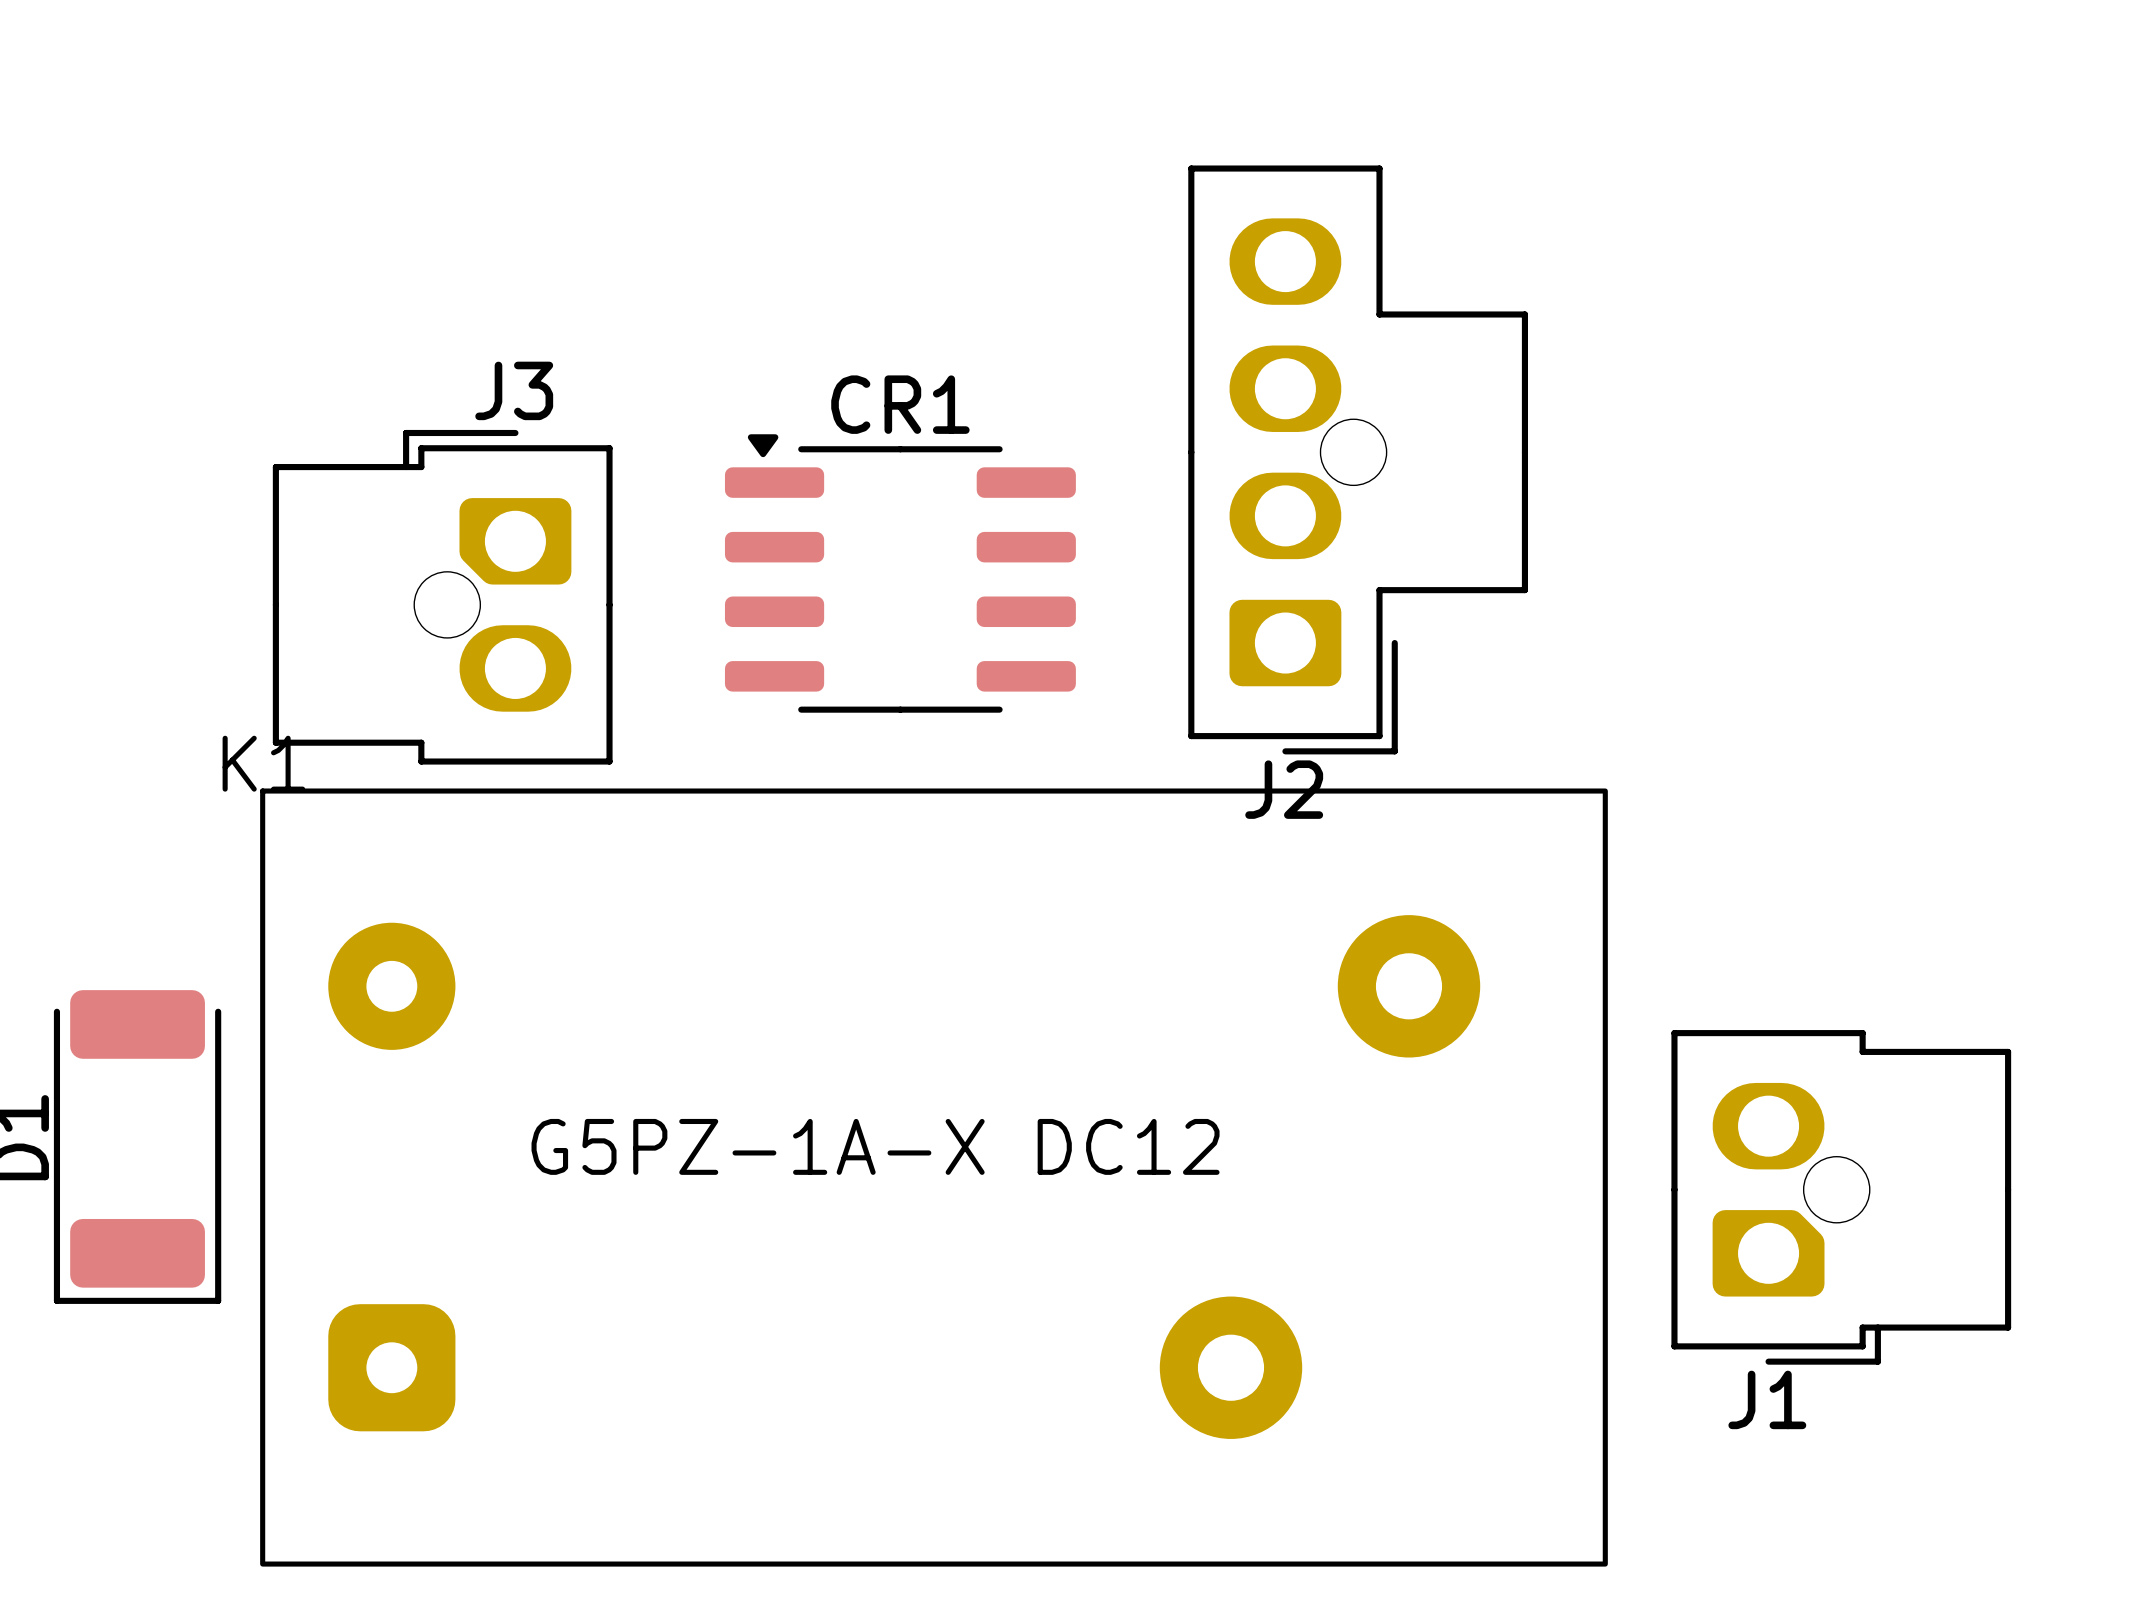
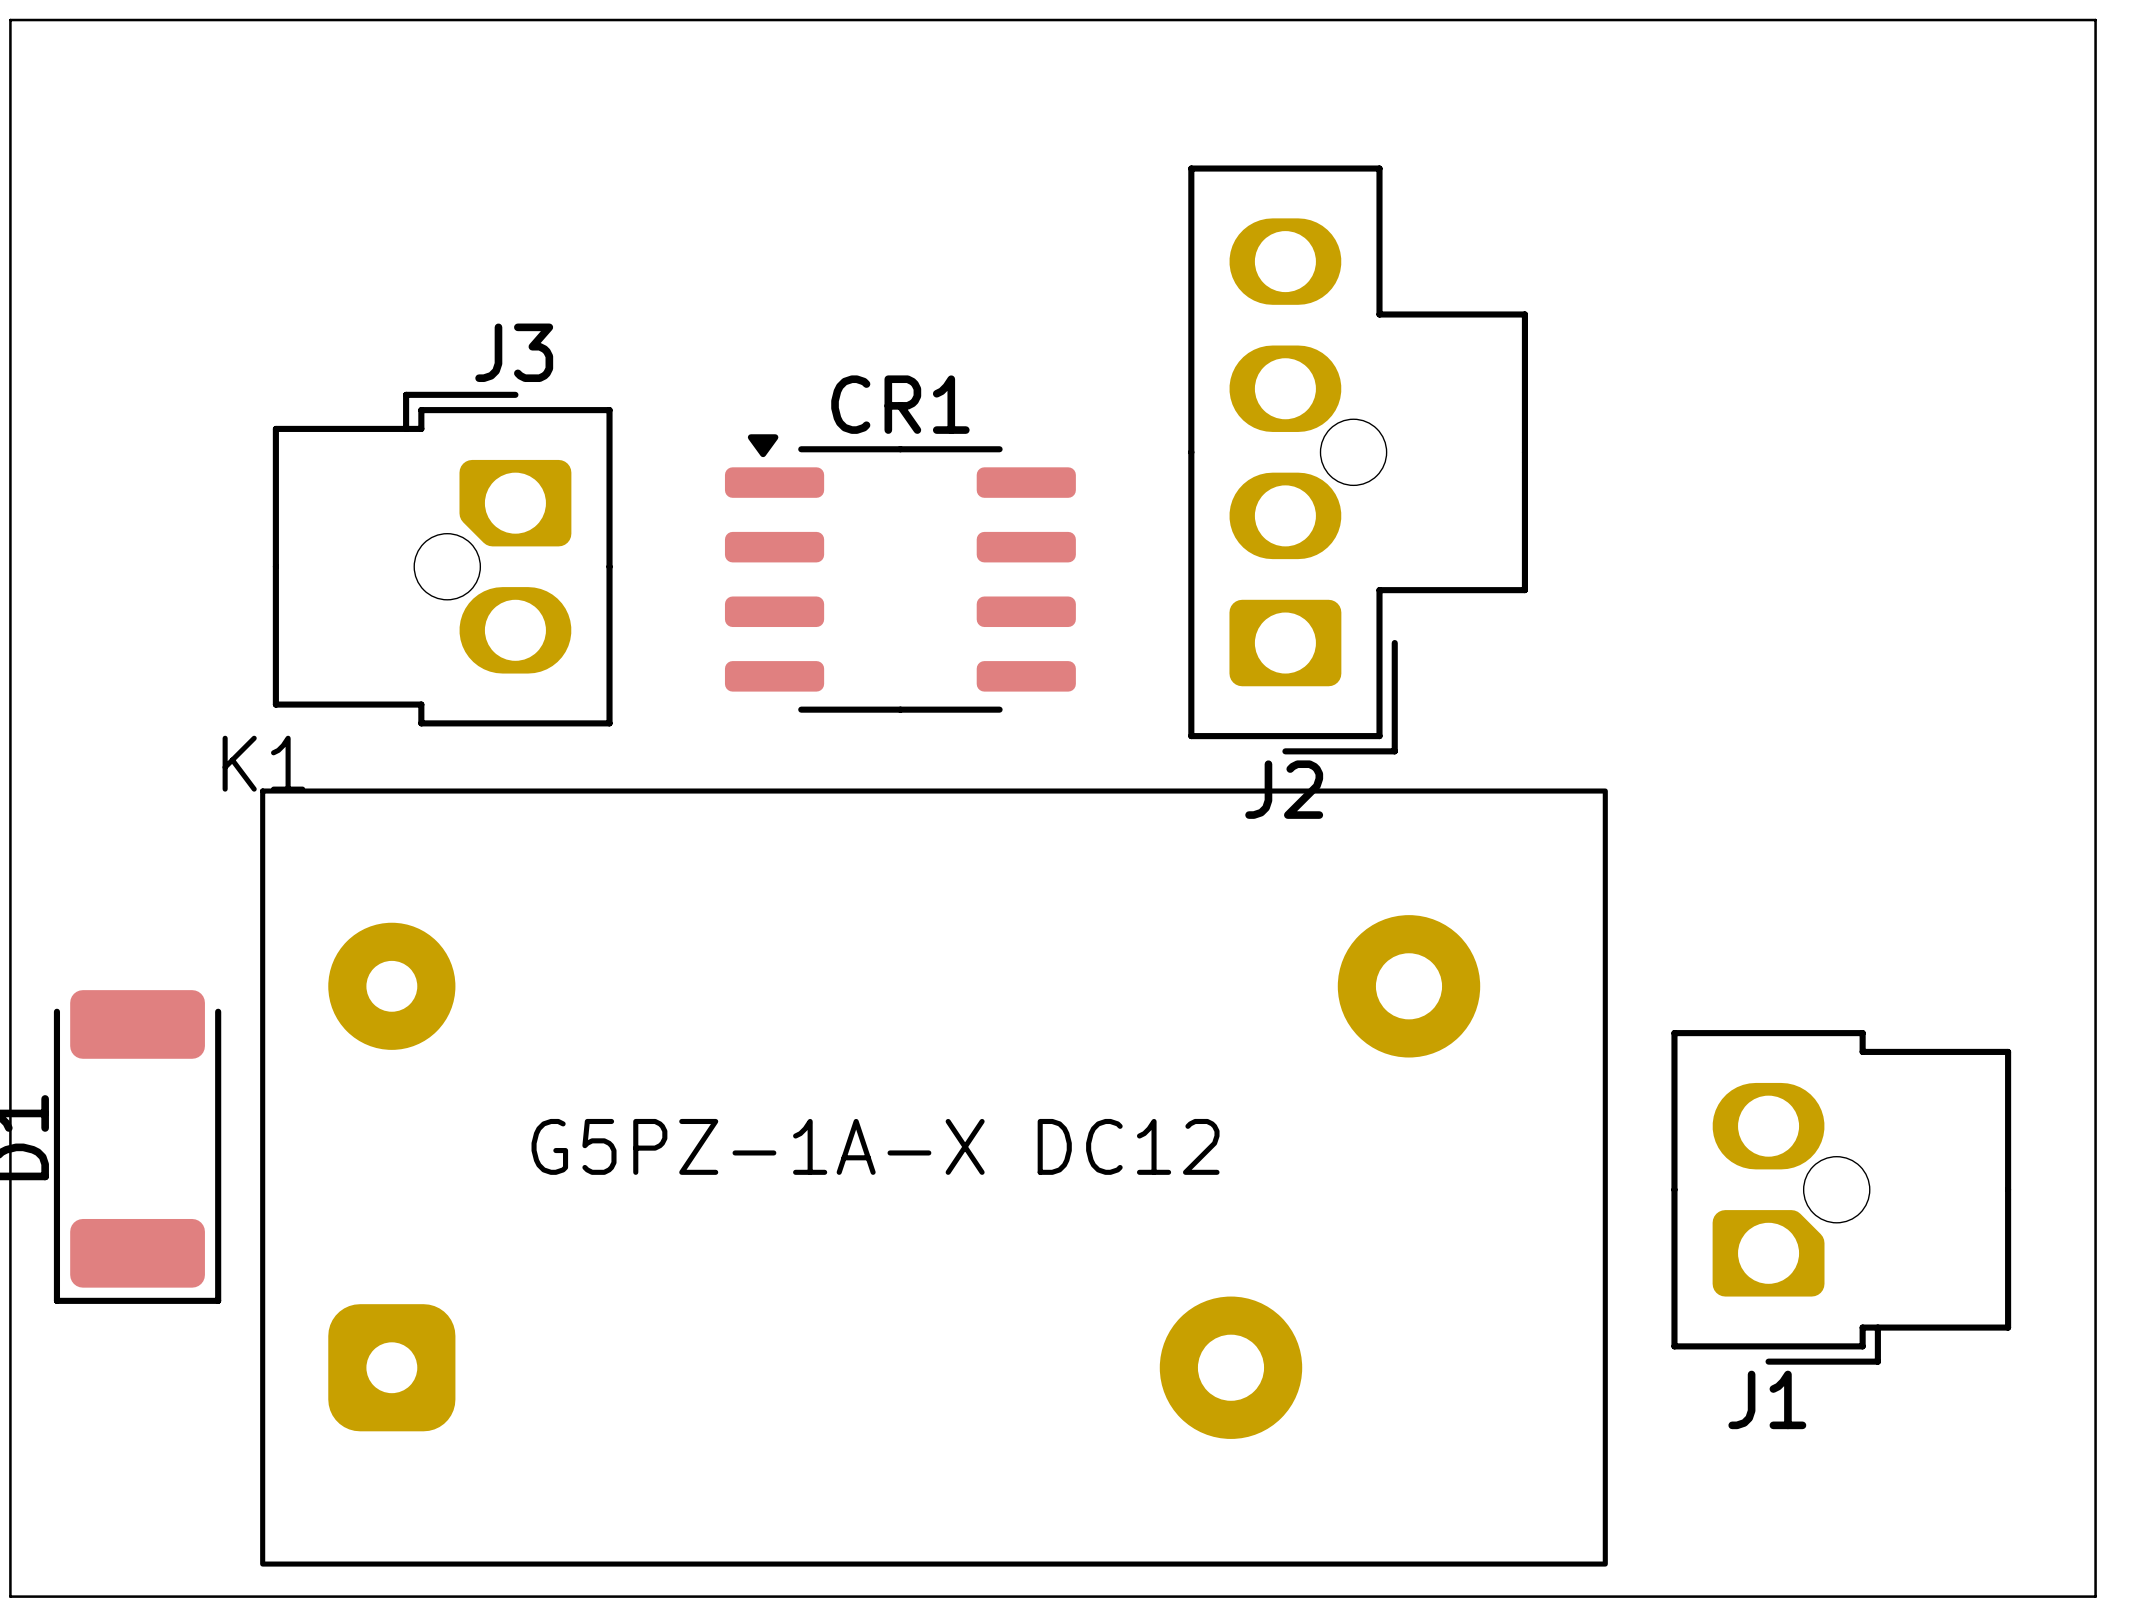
board edge: none -> (10, 20) (2095, 20) (2095, 1596) (10, 1596) (10, 20)
J3 position: (442, 597) -> (442, 559)

